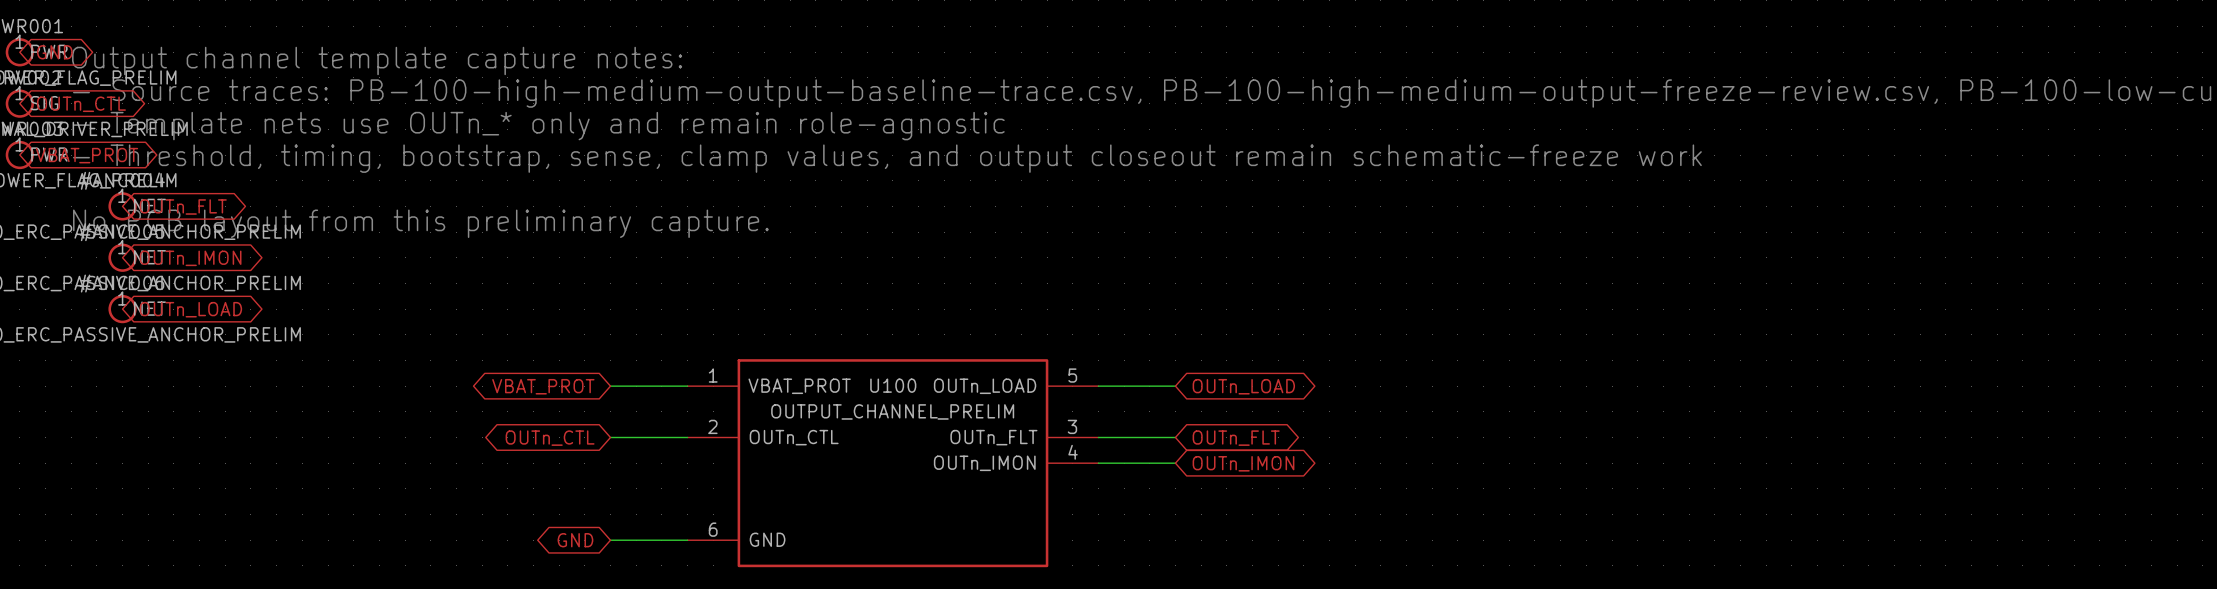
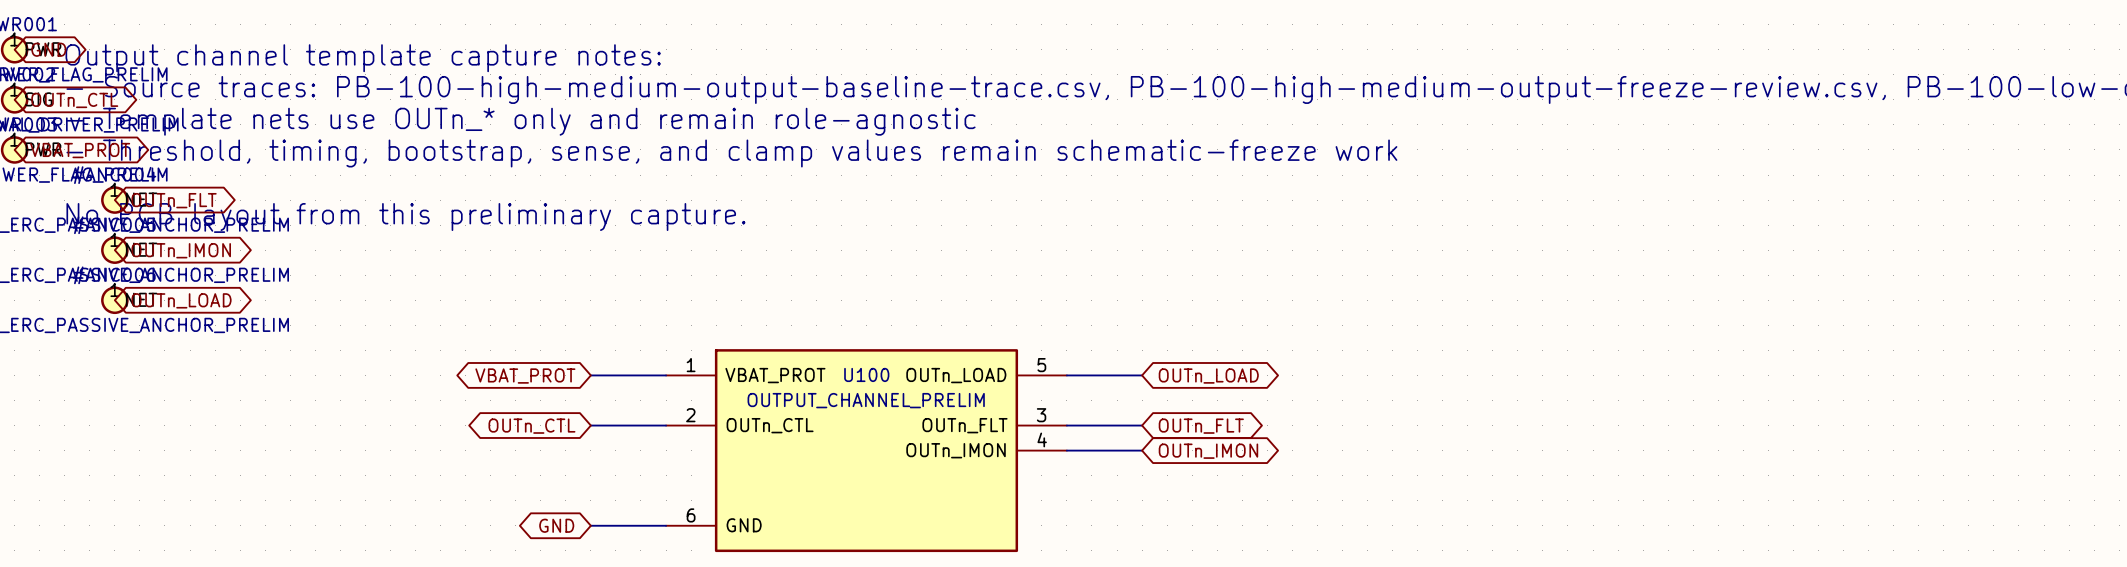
text: - Threshold, timing, bootstrap, sense, clamp values, and output closeout remain schematic-freeze work (887, 158) -> - Threshold, timing, bootstrap, sense, and clamp values remain schematic-freeze work (731, 153)

